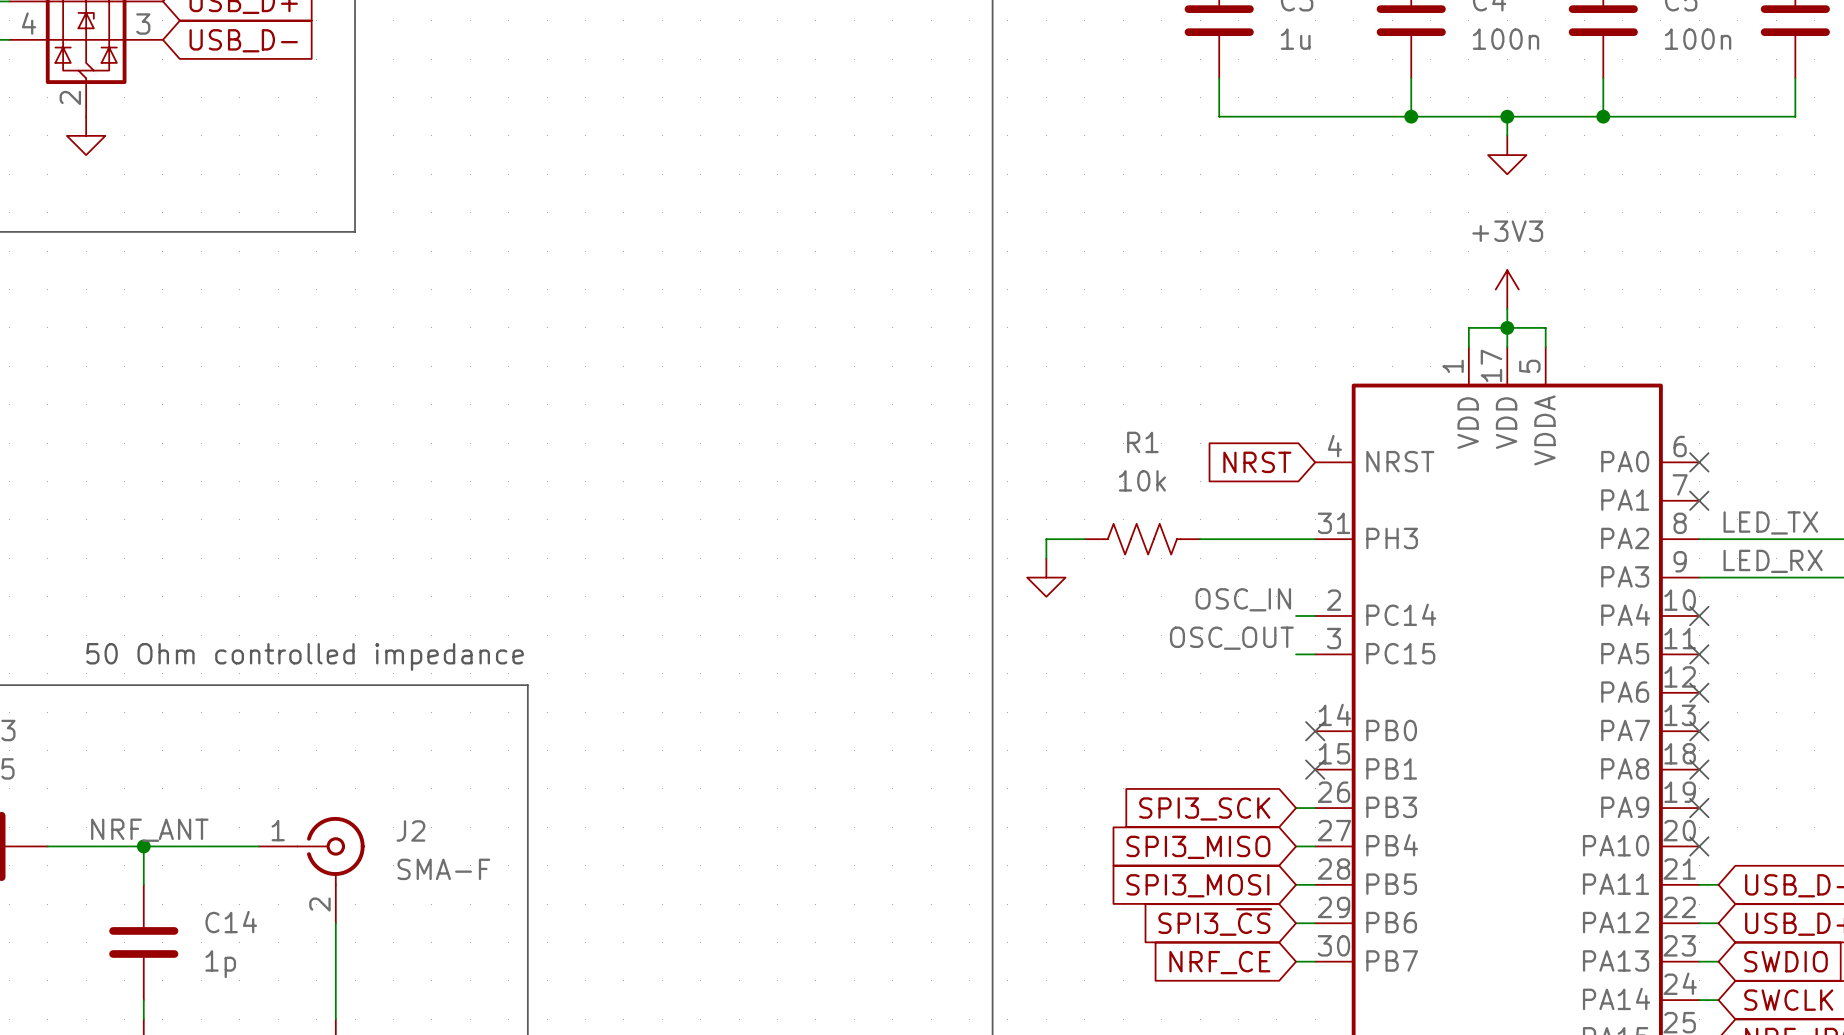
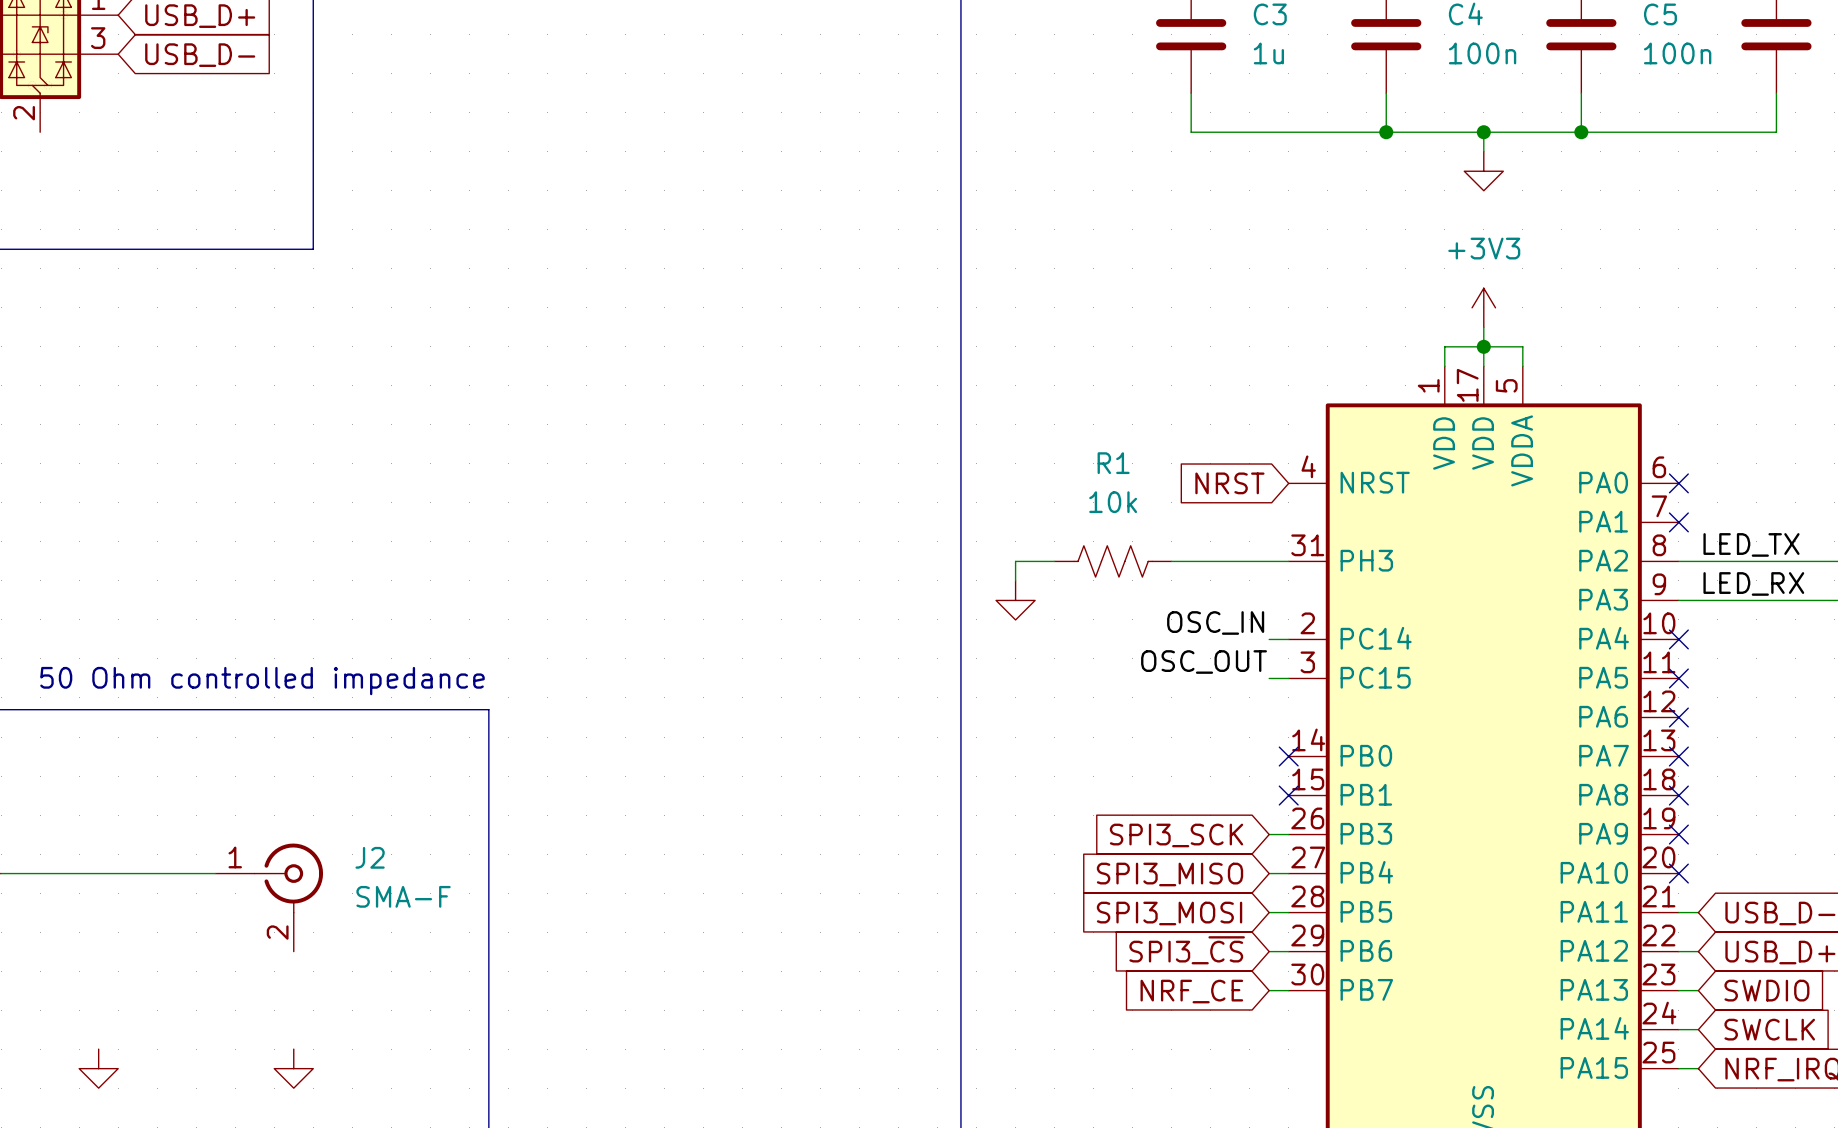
power symbol: (86, 135) -> none
label: NRF_ANT (149, 830) -> none
wire: (143, 846) (143, 884) -> none
junction: (143, 846) -> none
wire: (335, 923) (335, 1019) -> none
C14: 1p (143, 942) -> none
wire: (143, 1000) (143, 1019) -> none

